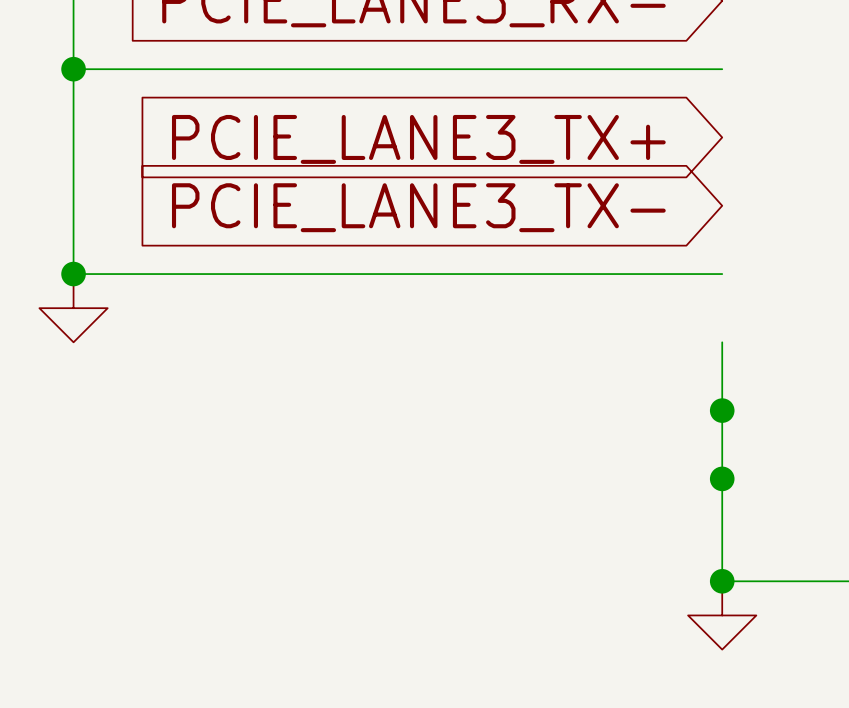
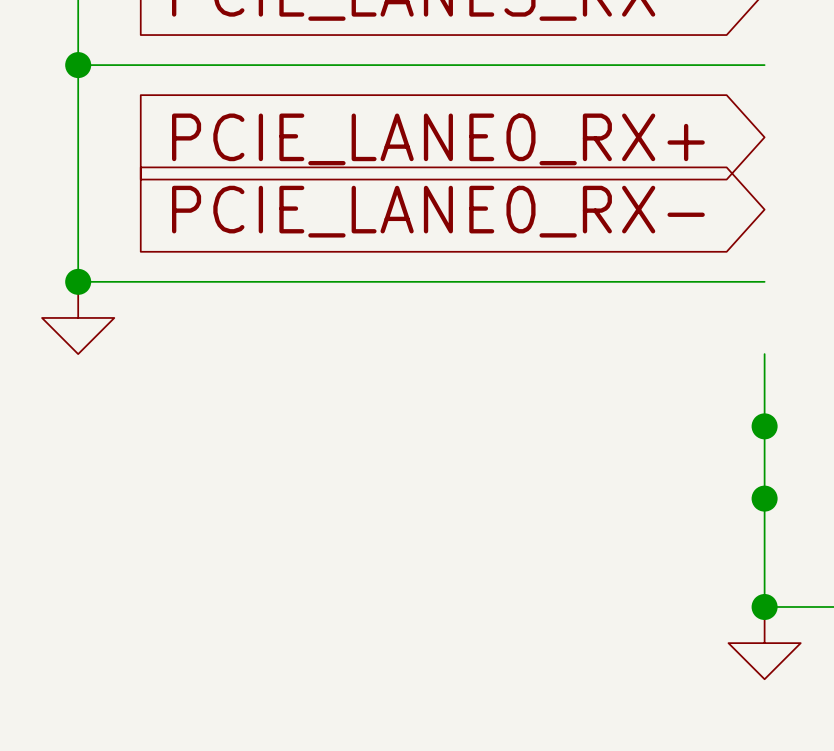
global label: PCIE_LANE3_TX+ (418, 139) -> PCIE_LANE0_RX+ (438, 139)
global label: PCIE_LANE3_TX- (418, 207) -> PCIE_LANE0_RX- (438, 211)

